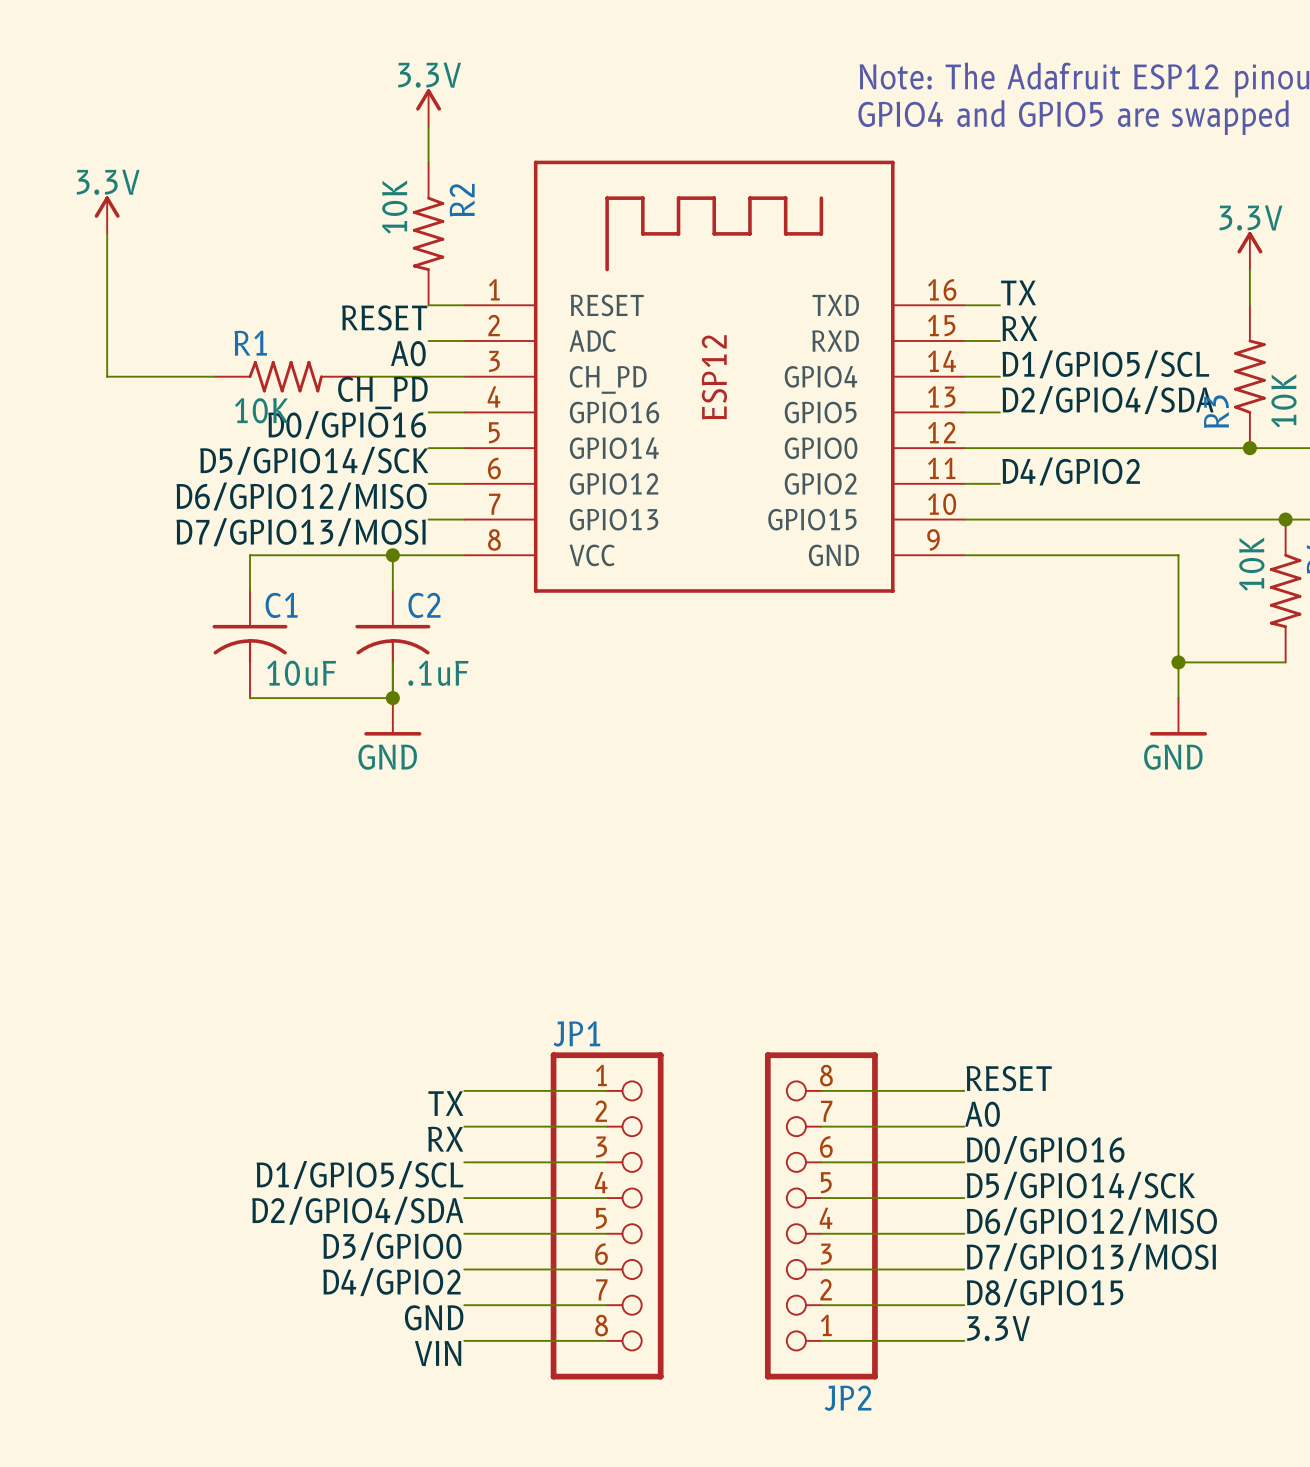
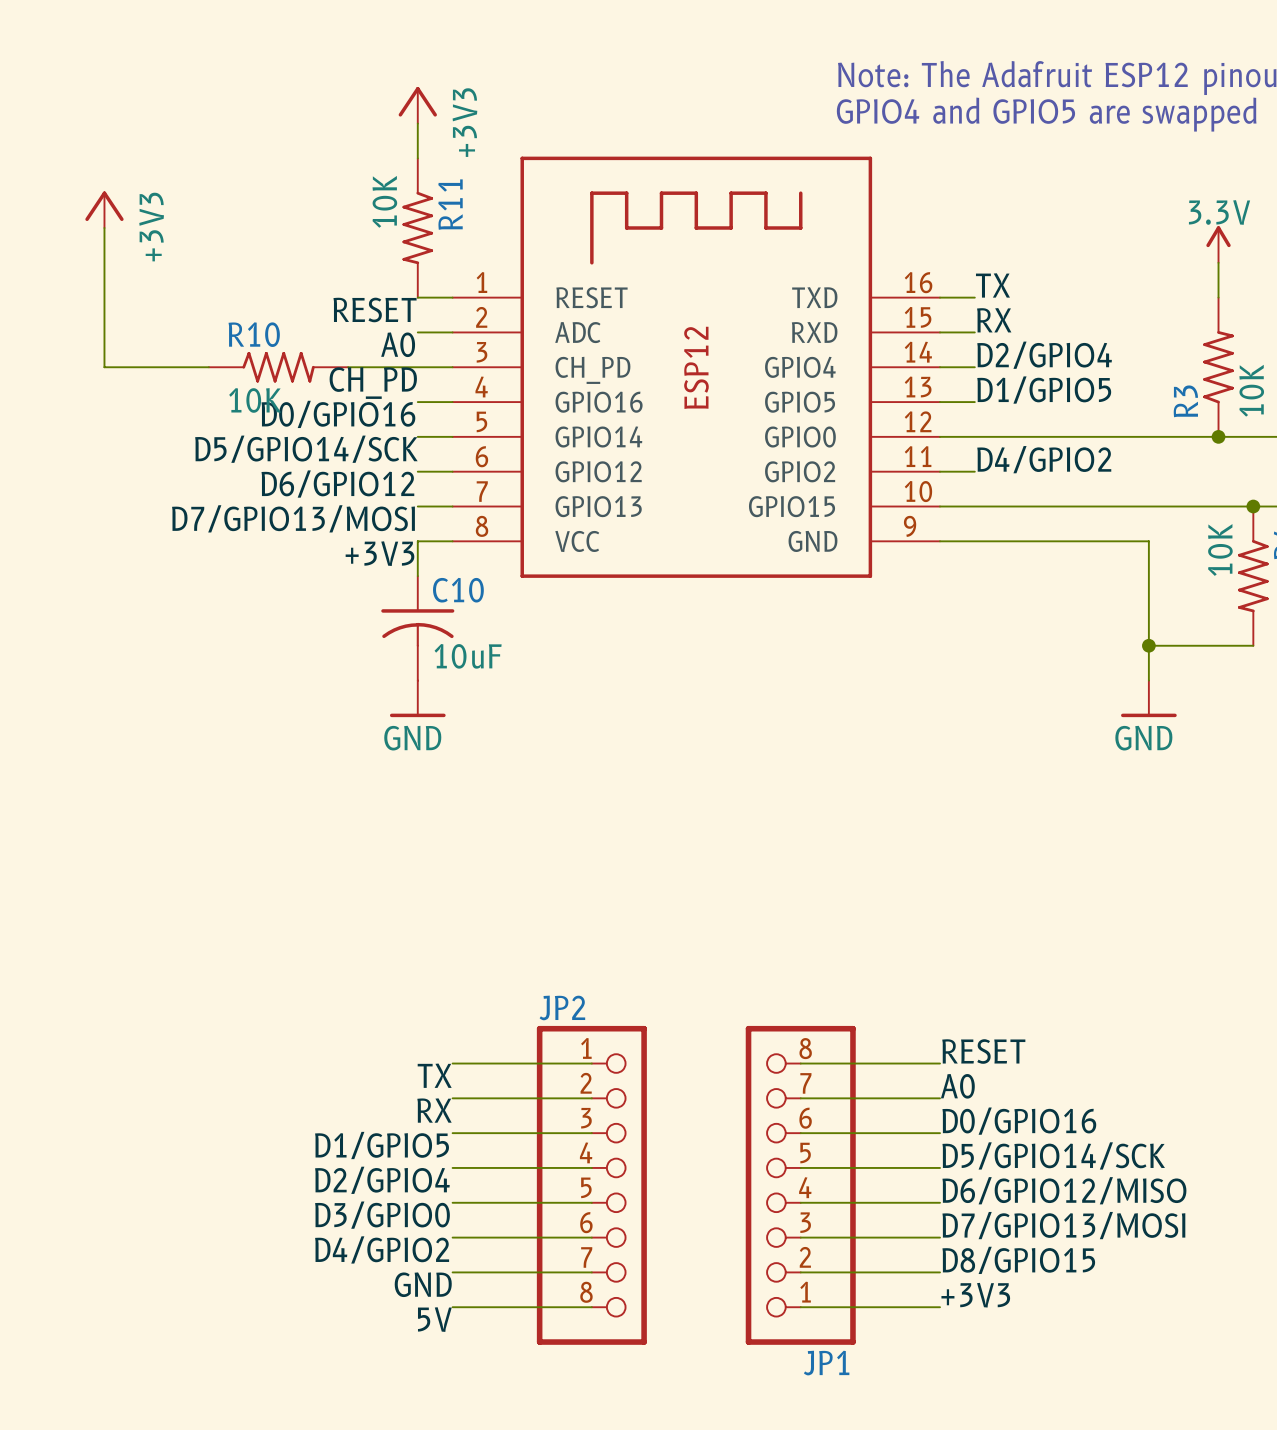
power symbol: 3.3V (428, 107) -> +3V3 (417, 105)
R2 name: R2 (462, 200) -> R11 (450, 204)
power symbol: 3.3V (107, 215) -> +3V3 (104, 209)
R1 name: R1 (250, 343) -> R10 (254, 334)
label: D1/GPIO5/SCL (1105, 364) -> D2/GPIO4 (1044, 355)
label: D2/GPIO4/SDA (1108, 400) -> D1/GPIO5 (1044, 390)
label: D6/GPIO12/MISO (301, 496) -> D6/GPIO12 (337, 484)
wire: (392, 555) (392, 590) -> none
junction: (392, 555) -> none
wire: (428, 555) (250, 555) (250, 590) -> (417, 541) (417, 576)
label: none -> +3V3 (379, 553)
C1: 10uF (250, 644) -> none
C2: .1uF (392, 644) -> none
C10: none -> 10uF (417, 628)
wire: (392, 662) (392, 698) (250, 698) -> none
junction: (392, 698) -> none
power symbol position: GND (392, 716) -> GND (417, 698)
JP1 name: JP1 (576, 1033) -> JP2 (562, 1007)
label: D1/GPIO5/SCL (359, 1175) -> D1/GPIO5 (382, 1145)
label: D2/GPIO4/SDA (357, 1210) -> D2/GPIO4 (382, 1180)
label: 3.3V (998, 1328) -> +3V3 (975, 1295)
label: VIN (438, 1353) -> 5V (434, 1319)
JP2 name: JP2 (847, 1398) -> JP1 (826, 1363)

